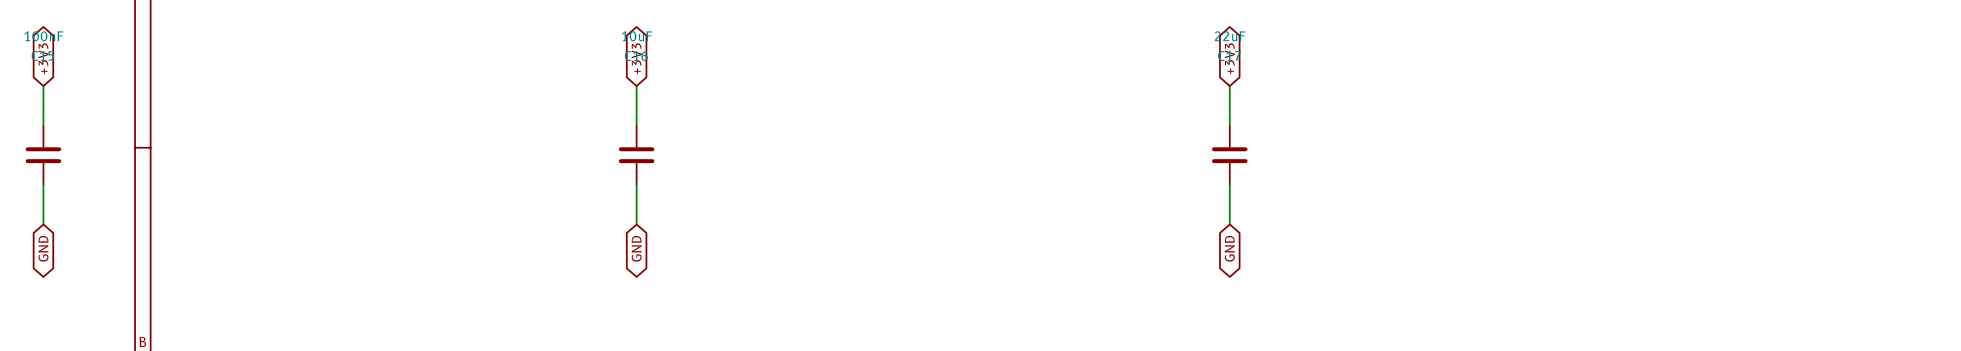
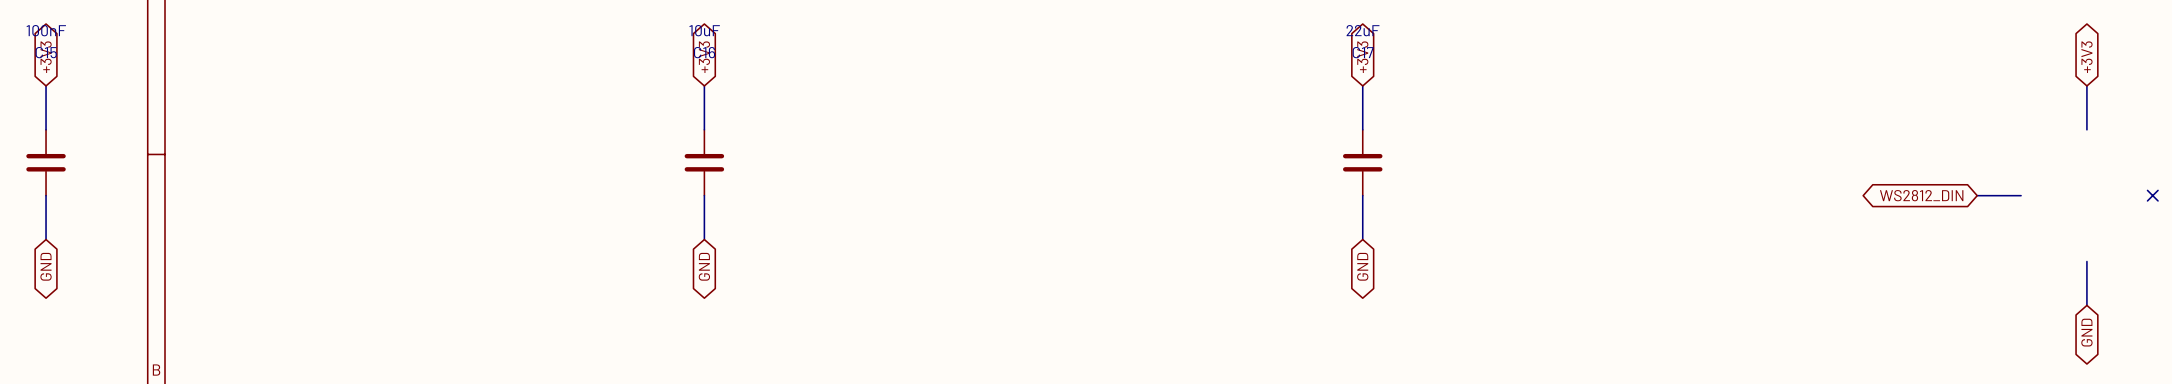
global label: none -> +3V3 (2087, 57)
wire: none -> (2086, 85) (2086, 129)
wire: none -> (1977, 195) (2021, 195)
no-connect mark: none -> (2152, 195)
global label: none -> WS2812_DIN (1921, 195)
wire: none -> (2086, 261) (2086, 305)
global label: none -> GND (2086, 332)

